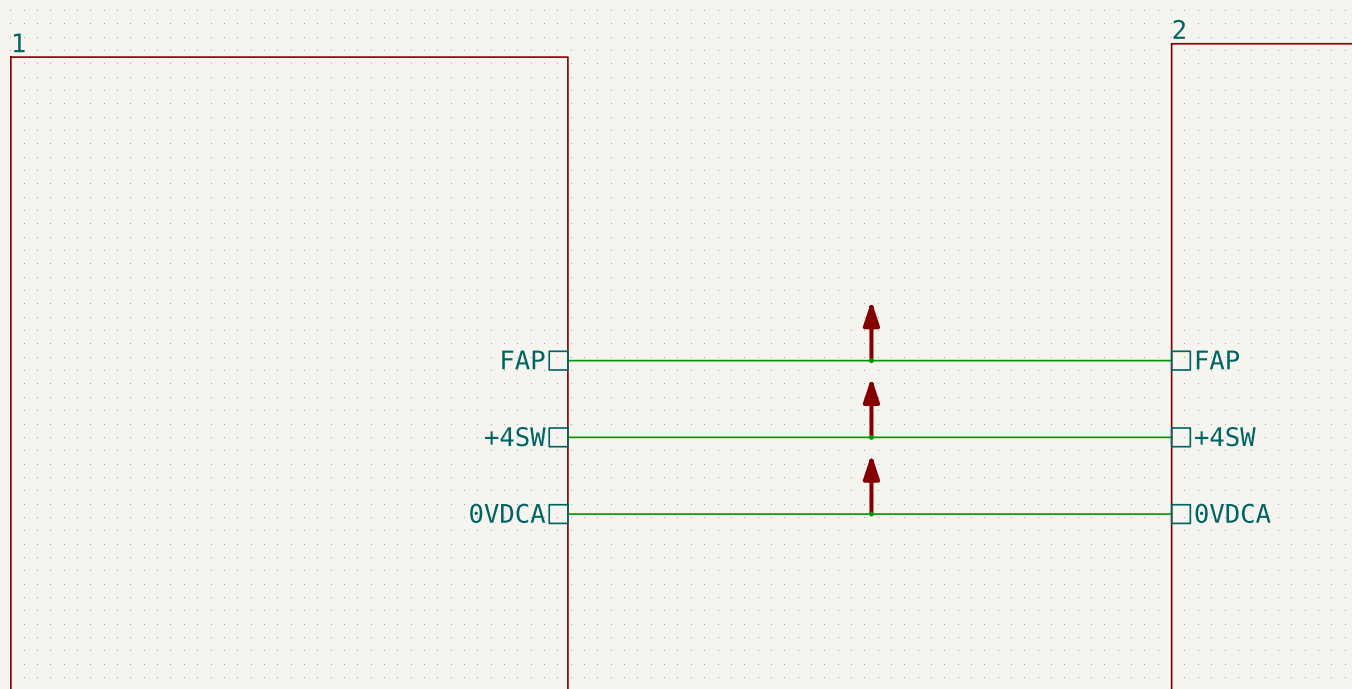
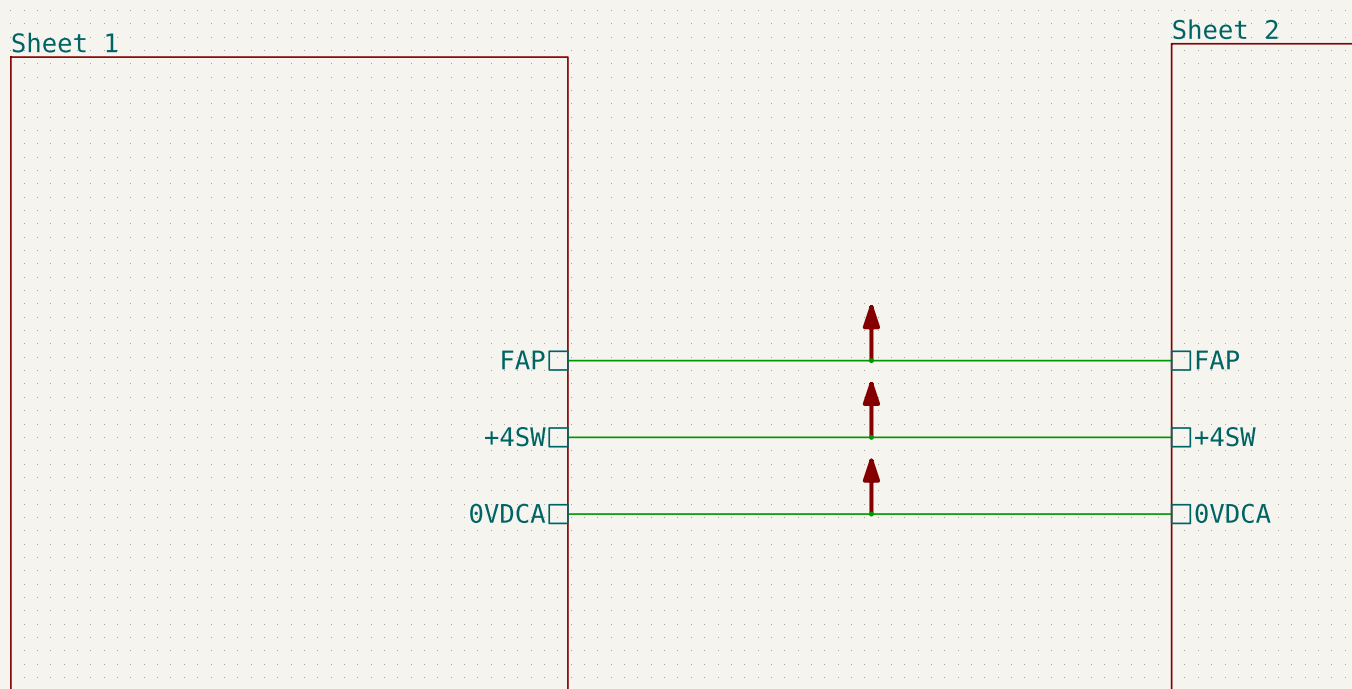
sheet 2 name: 2 (1179, 29) -> Sheet 2 (1225, 29)
sheet 1 name: 1 (19, 42) -> Sheet 1 (64, 42)

